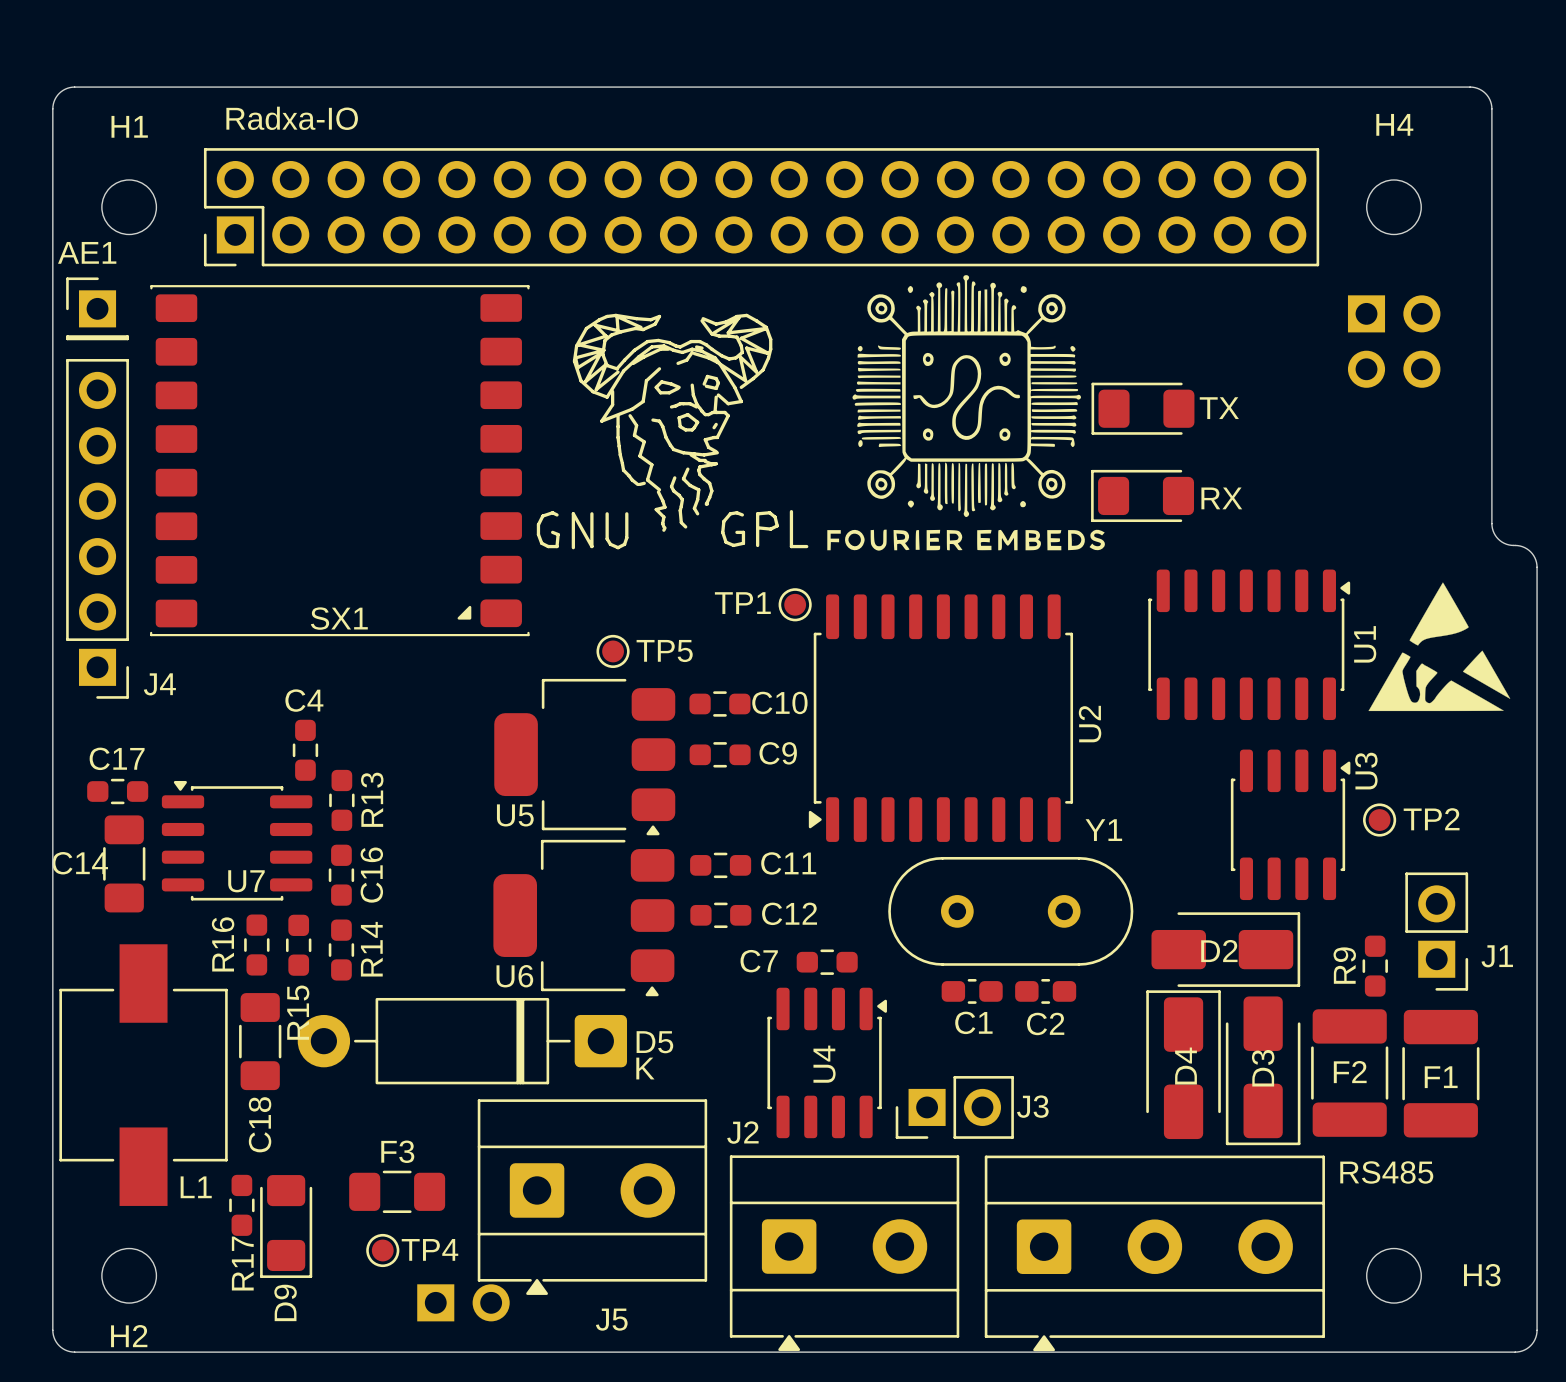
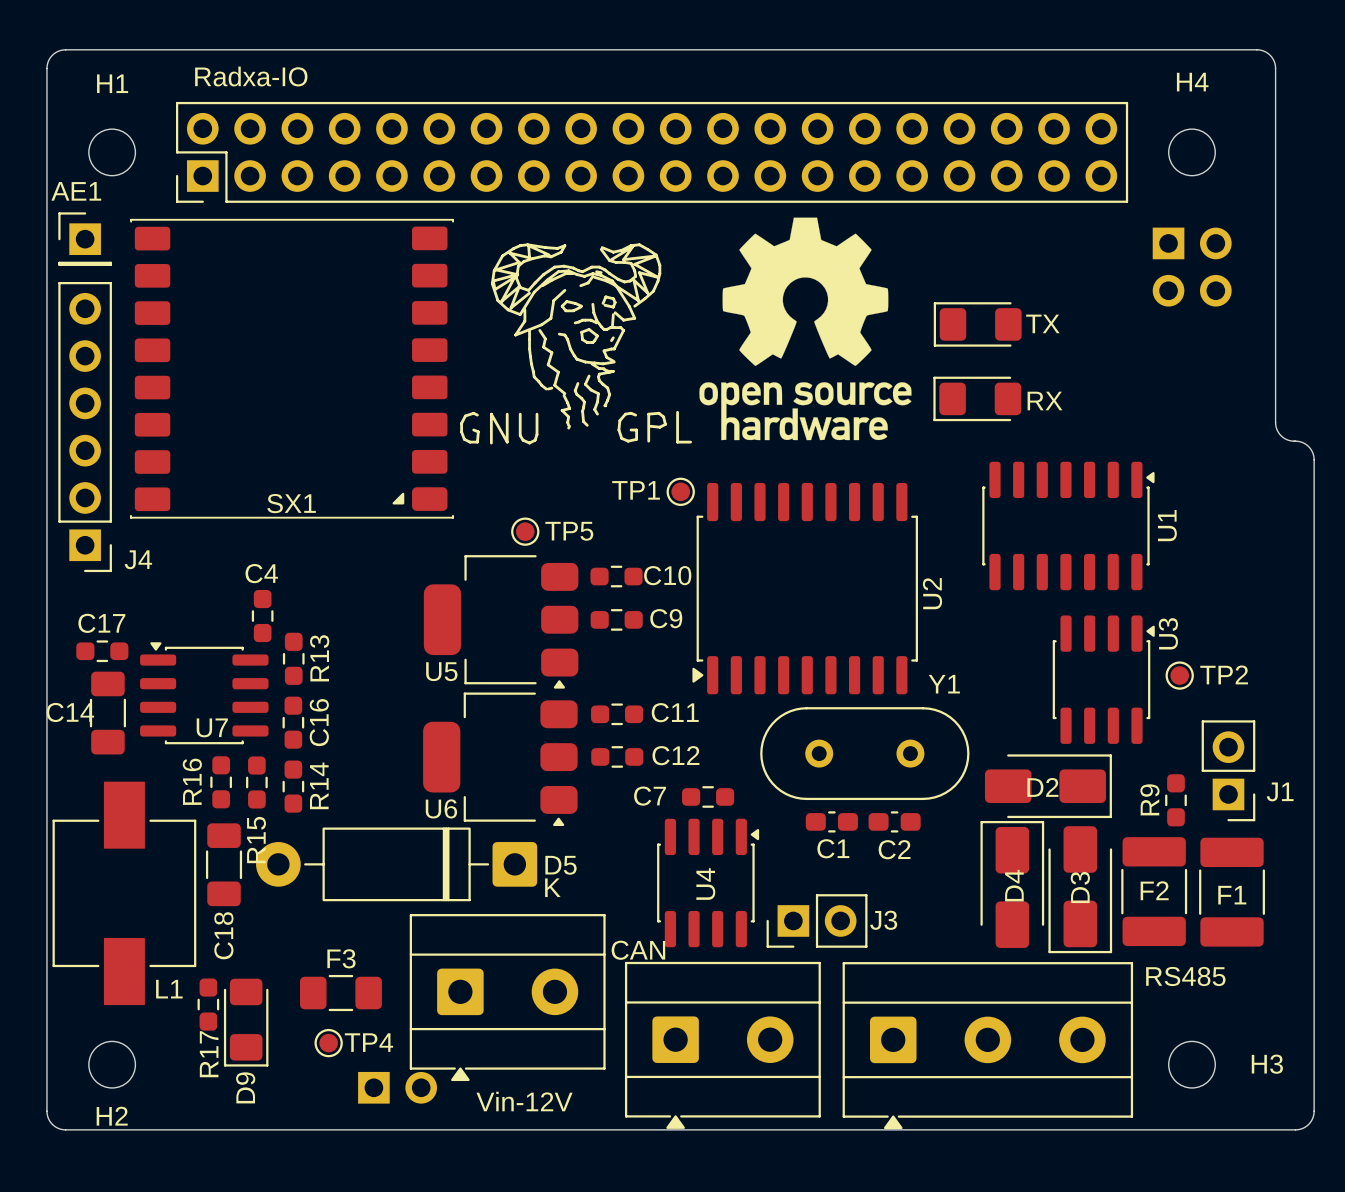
drawing: [827, 275, 1105, 551] -> none
drawing: none -> [699, 217, 912, 441]
drawing: [1368, 582, 1511, 712] -> none
J2 name: J2 (742, 1132) -> CAN (638, 950)
J5 name: J5 (611, 1319) -> Vin-12V (524, 1101)

